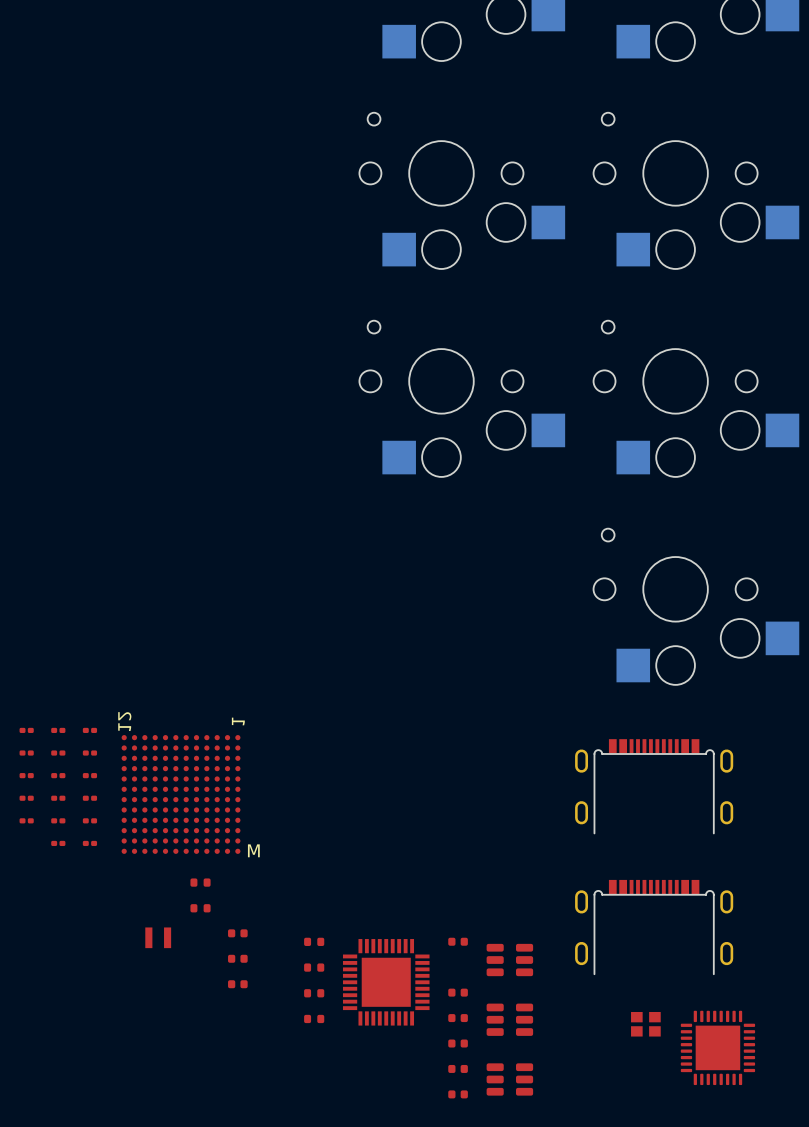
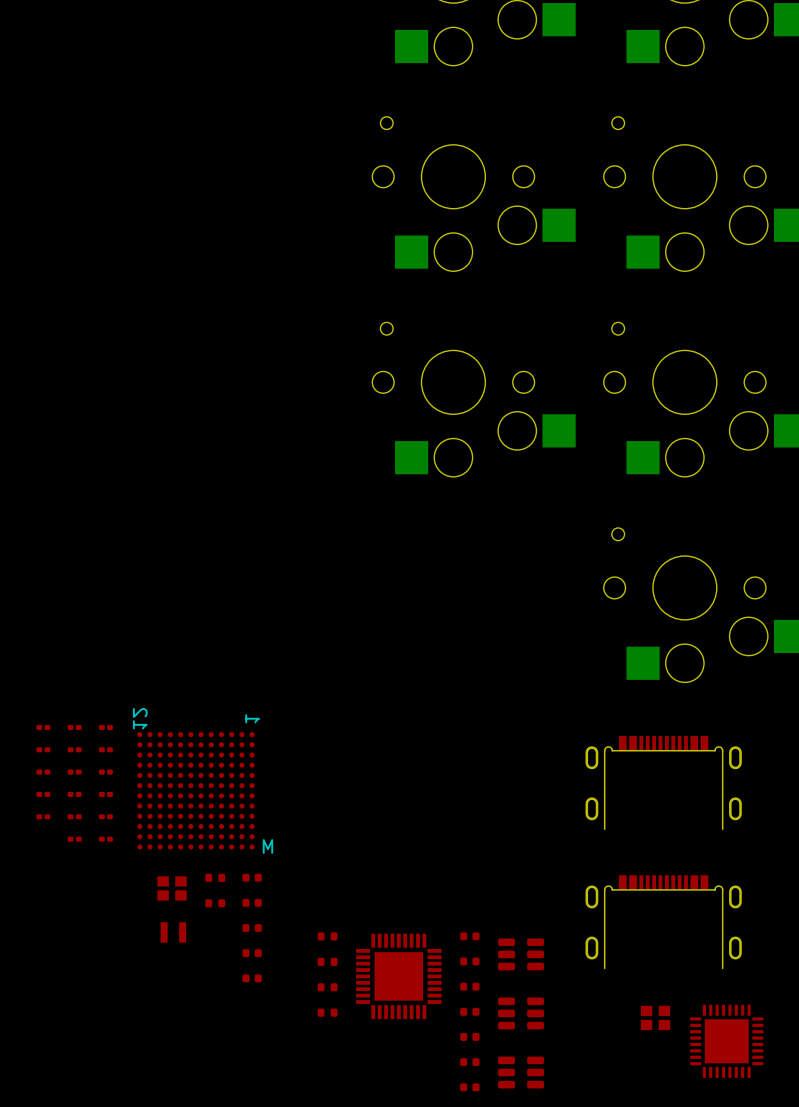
part: none -> (252, 877)
part: none -> (172, 888)
part: none -> (252, 902)
part: none -> (469, 961)

